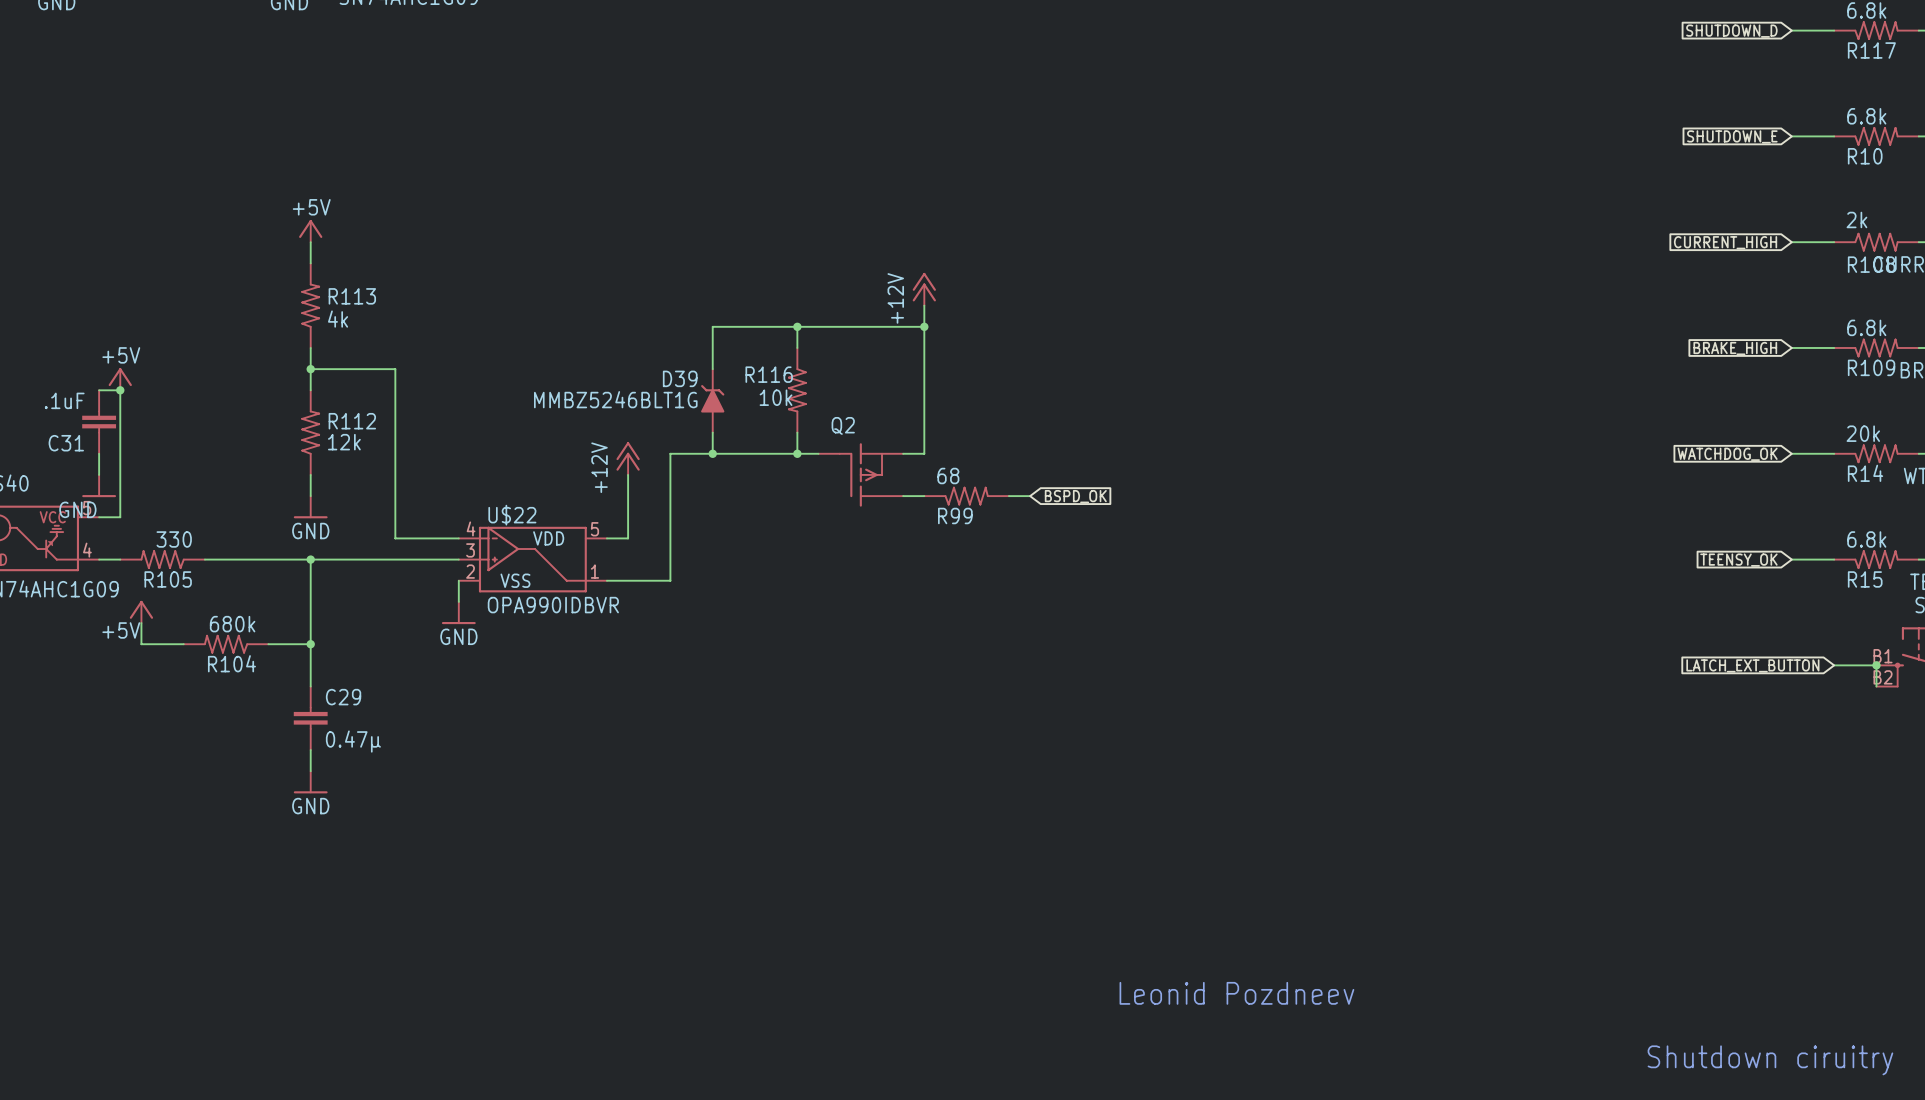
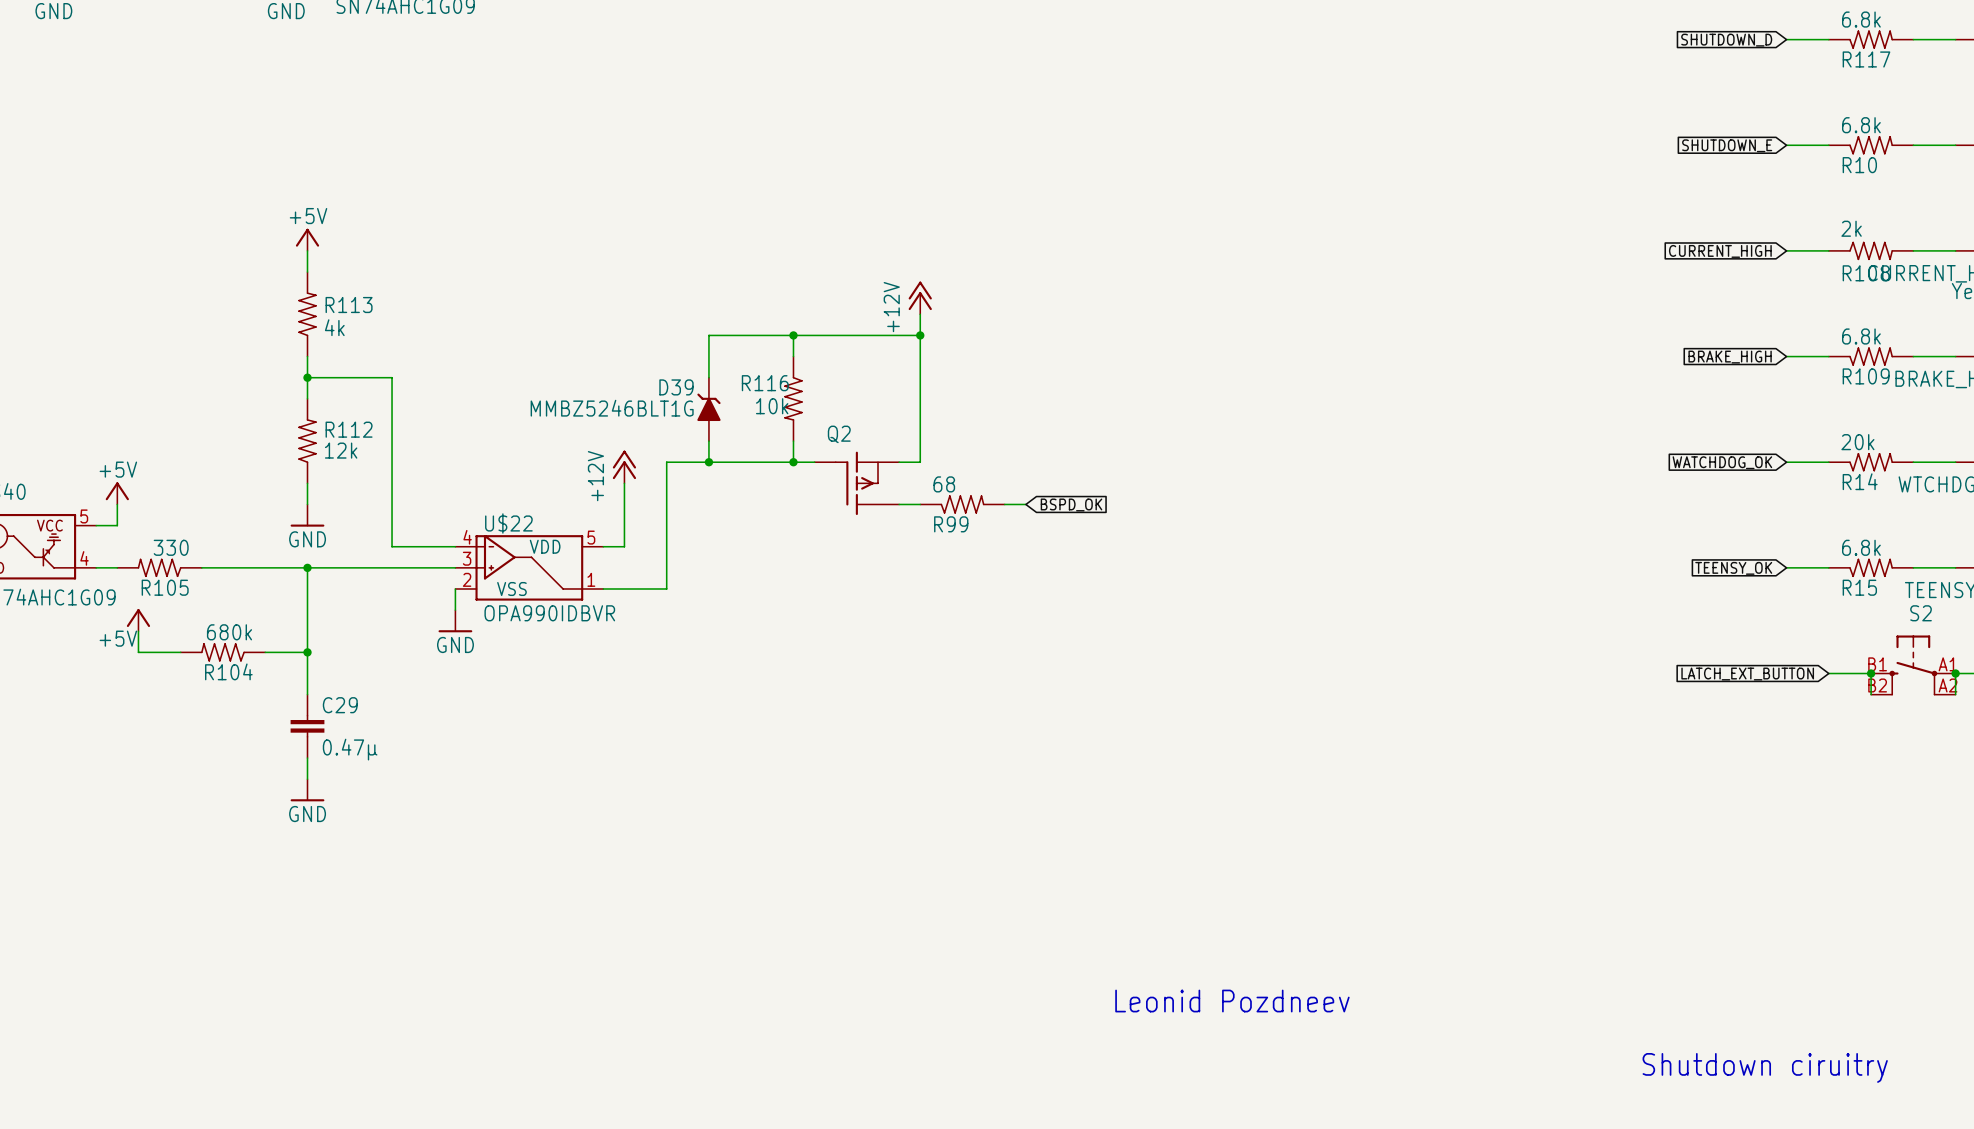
power symbol position: +5V (120, 379) -> +5V (117, 493)
wire: (99, 390) (120, 390) (120, 496) -> none
junction: (120, 390) -> none
C31: .1uF (99, 422) -> none
wire: (99, 453) (99, 474) -> none
power symbol: GND (99, 486) -> none

